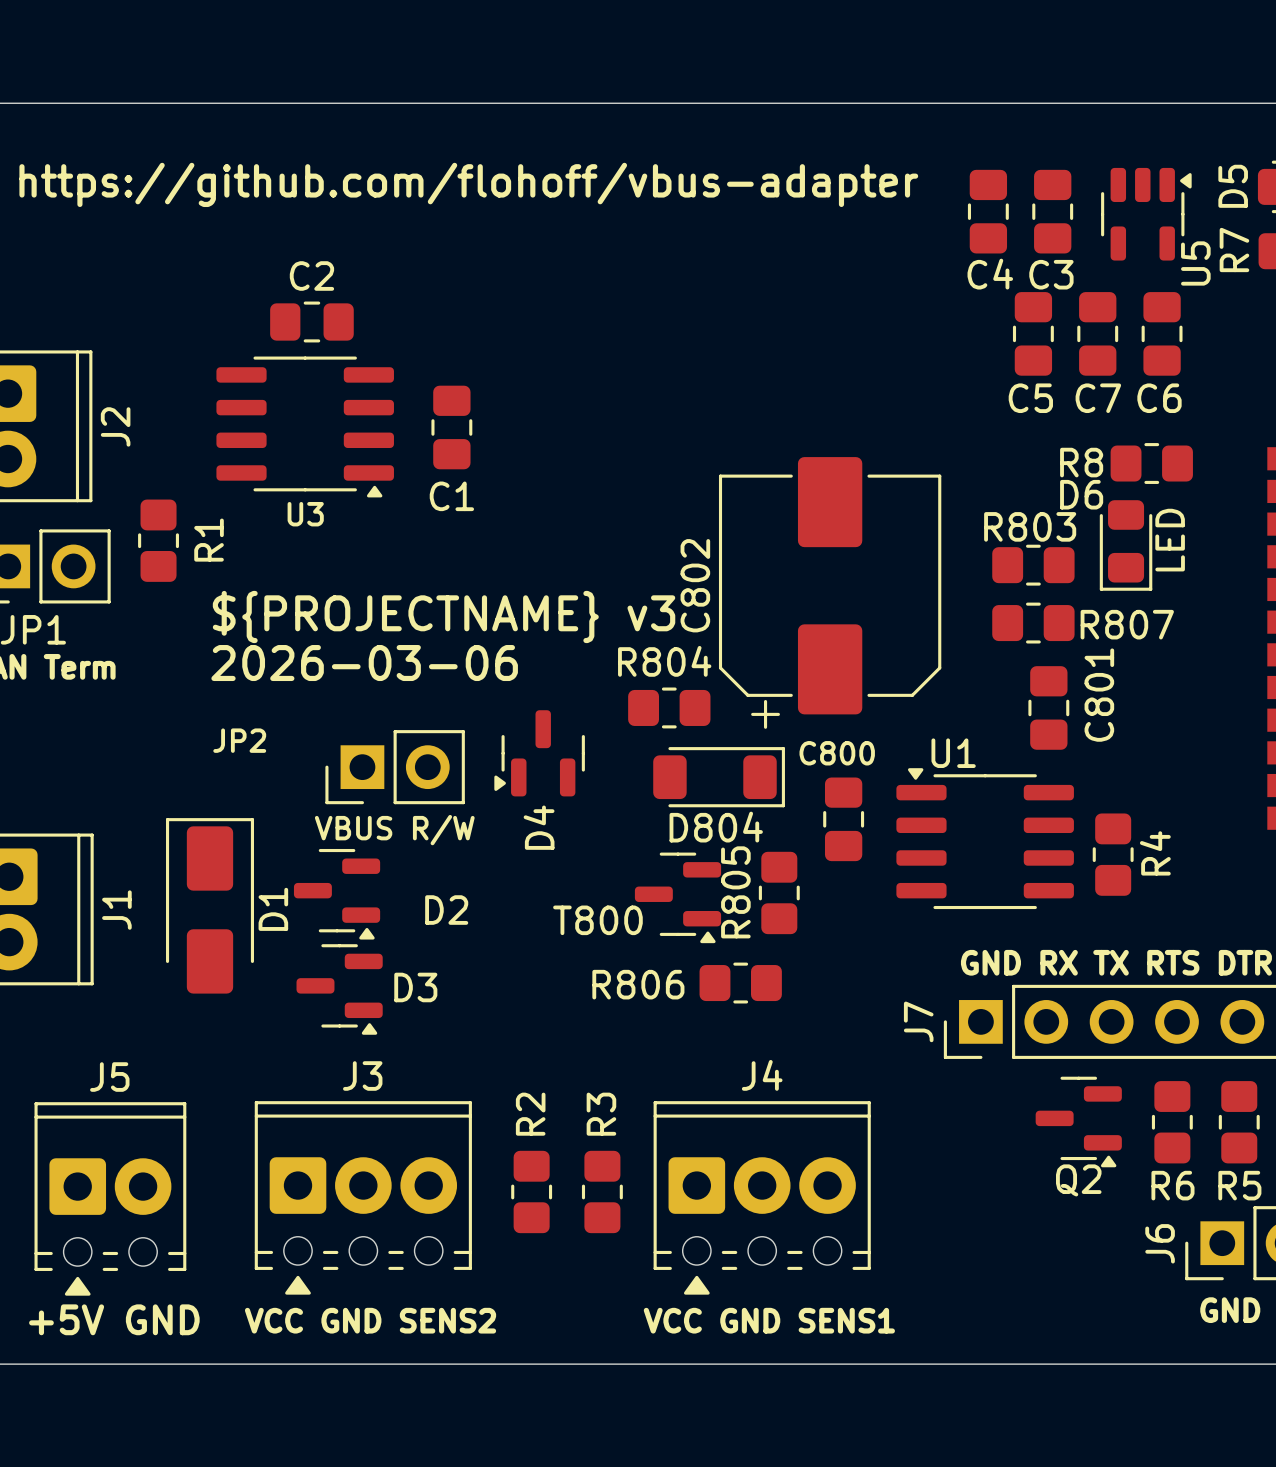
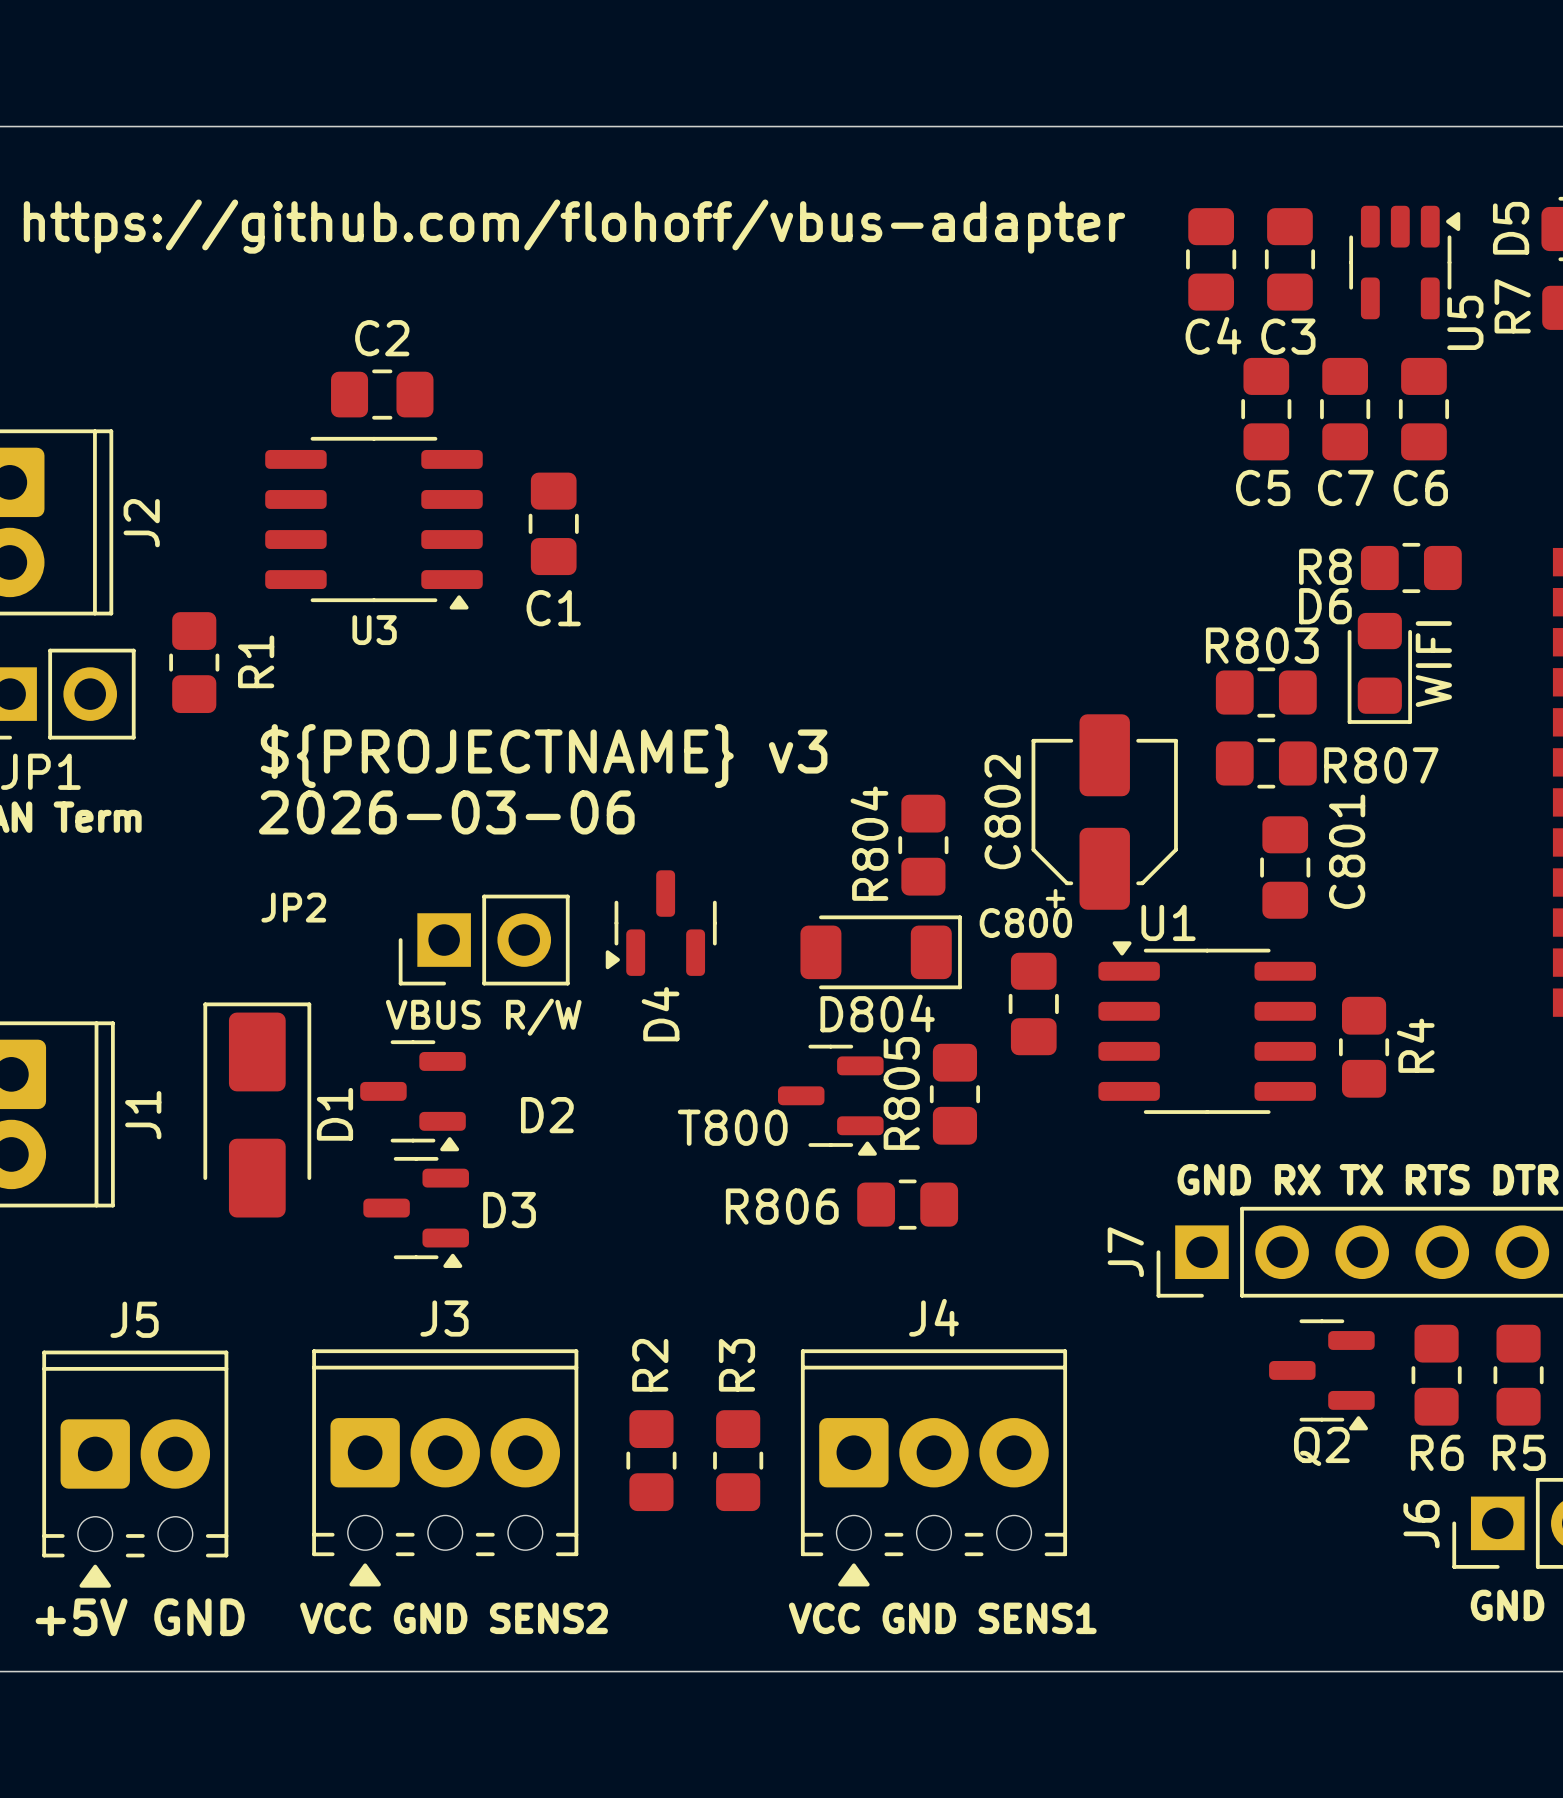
C802 footprint: [718, 457, 942, 729] -> [1031, 714, 1178, 910]
D6 value: LED (1170, 540) -> WIFI (1433, 664)
C802 name position: C802 (695, 585) -> C802 (1002, 812)
R804 name position: R804 (664, 661) -> R804 (869, 843)
R804 rotation: 0° (669, 707) -> 90° clockwise (923, 845)
R804 position: (669, 707) -> (923, 845)

